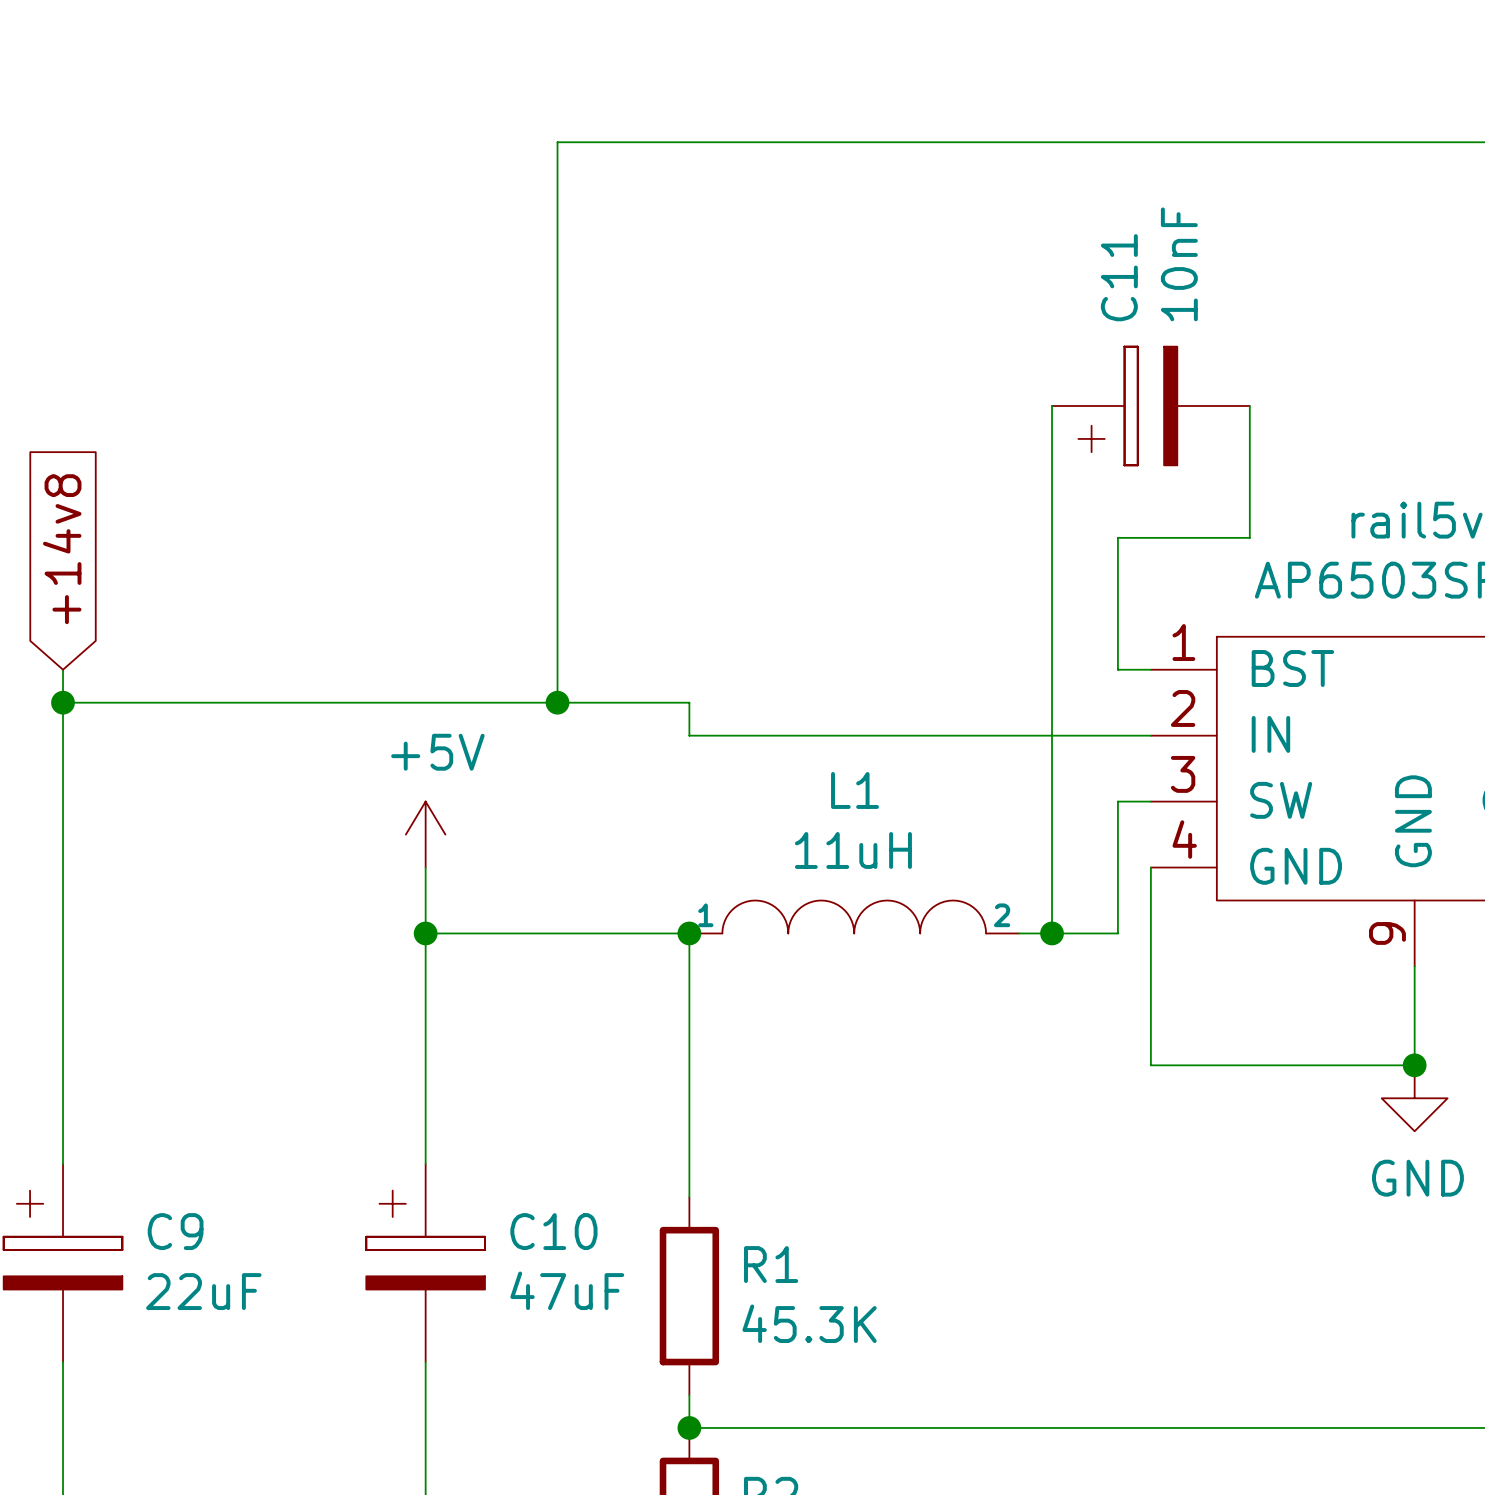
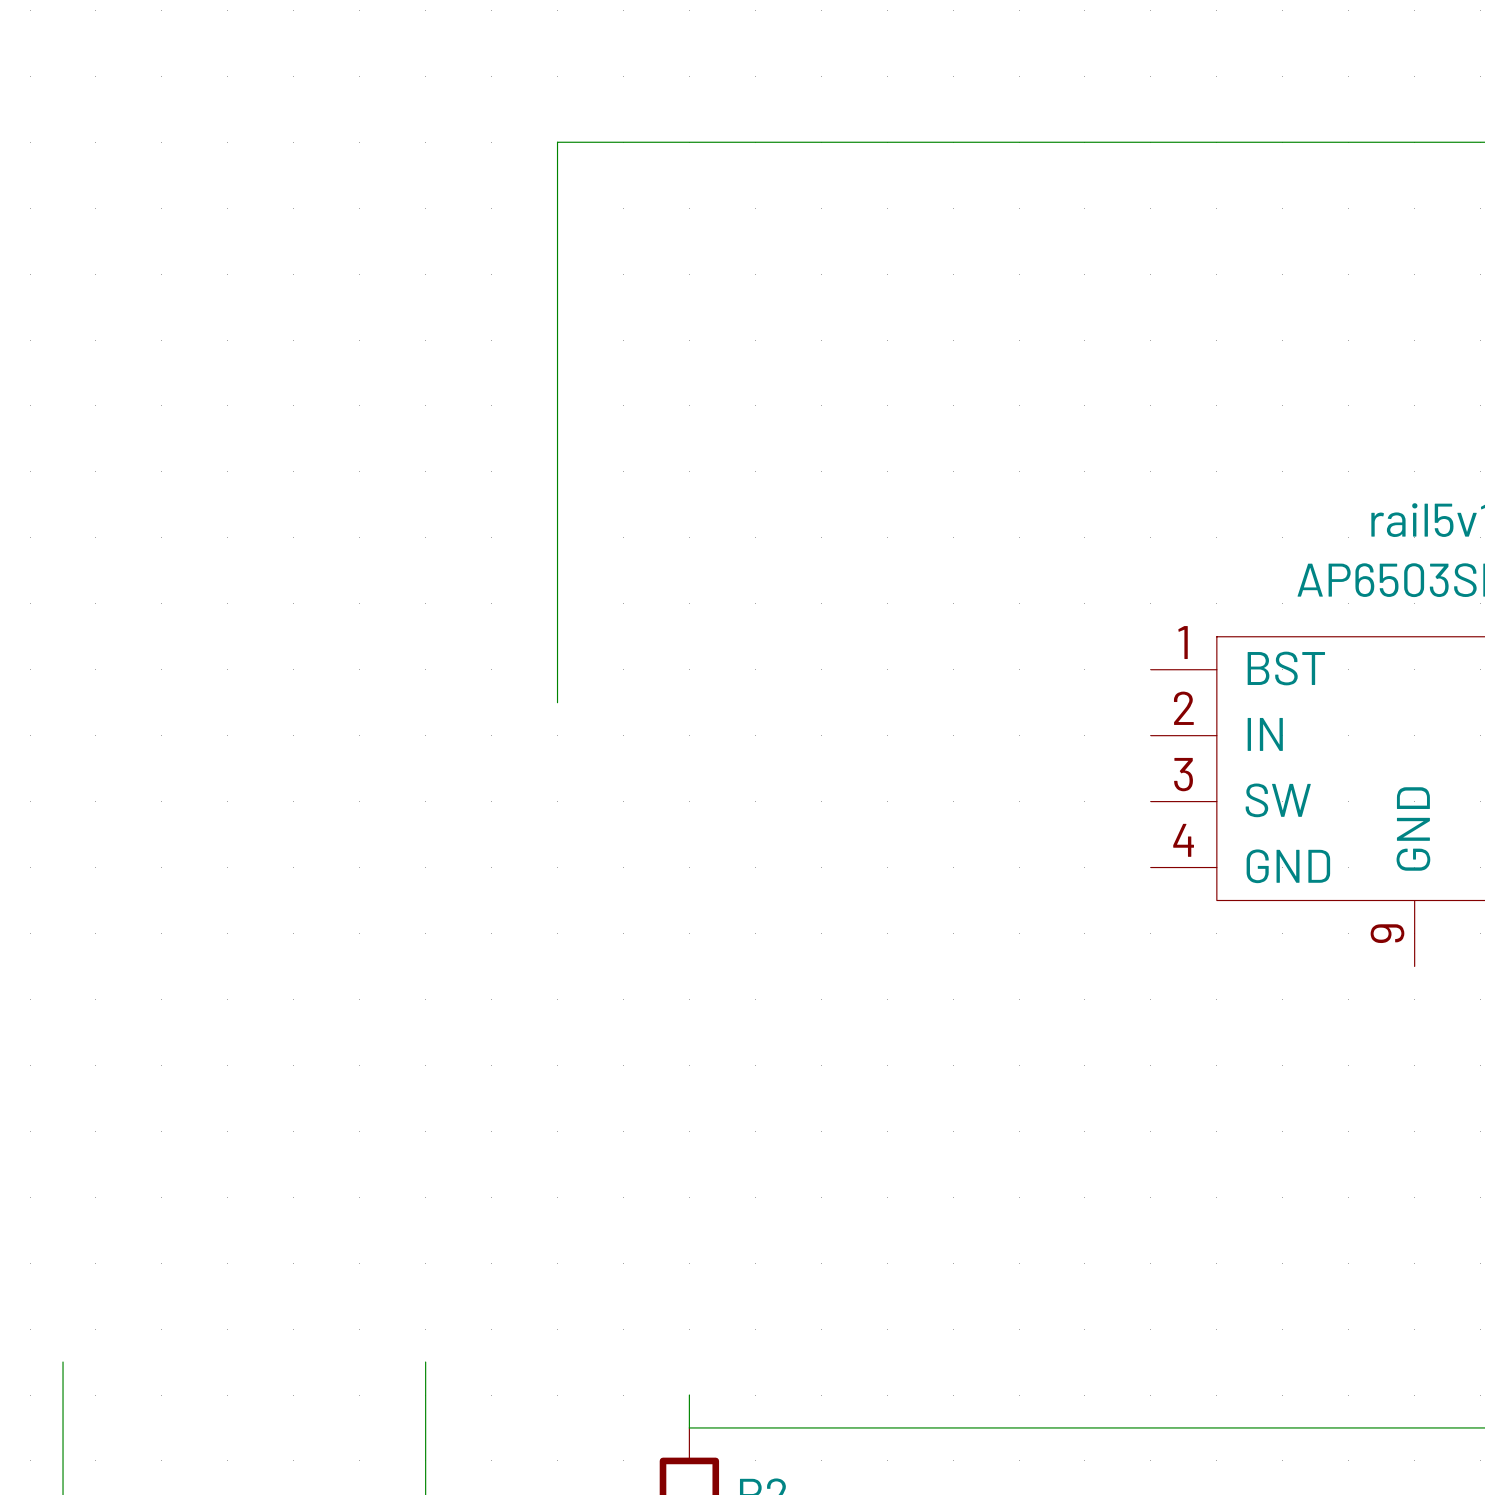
wire: (1052, 405) (1052, 933) -> none
C11: 10nF (1150, 405) -> none
wire: (1249, 405) (1249, 537) (1117, 537) (1117, 669) (1150, 669) -> none
global label: +14v8 (62, 549) -> none
wire: (63, 669) (63, 1164) -> none
wire: (63, 702) (689, 702) (689, 735) (1150, 735) -> none
junction: (63, 702) -> none
junction: (557, 702) -> none
wire: (1150, 801) (1117, 801) (1117, 933) (1019, 933) -> none
power symbol: +5V (425, 834) -> none
wire: (425, 867) (425, 1164) -> none
wire: (1150, 867) (1150, 1065) (1414, 1065) (1414, 966) -> none
L1: 11uH (854, 916) -> none
wire: (425, 933) (689, 933) (689, 1197) -> none
junction: (425, 933) -> none
junction: (689, 933) -> none
junction: (1052, 933) -> none
junction: (1414, 1065) -> none
power symbol: GND (1414, 1098) -> none
C9: 22uF (63, 1263) -> none
C10: 47uF (425, 1263) -> none
R1: 45.3K (689, 1296) -> none
junction: (689, 1427) -> none

